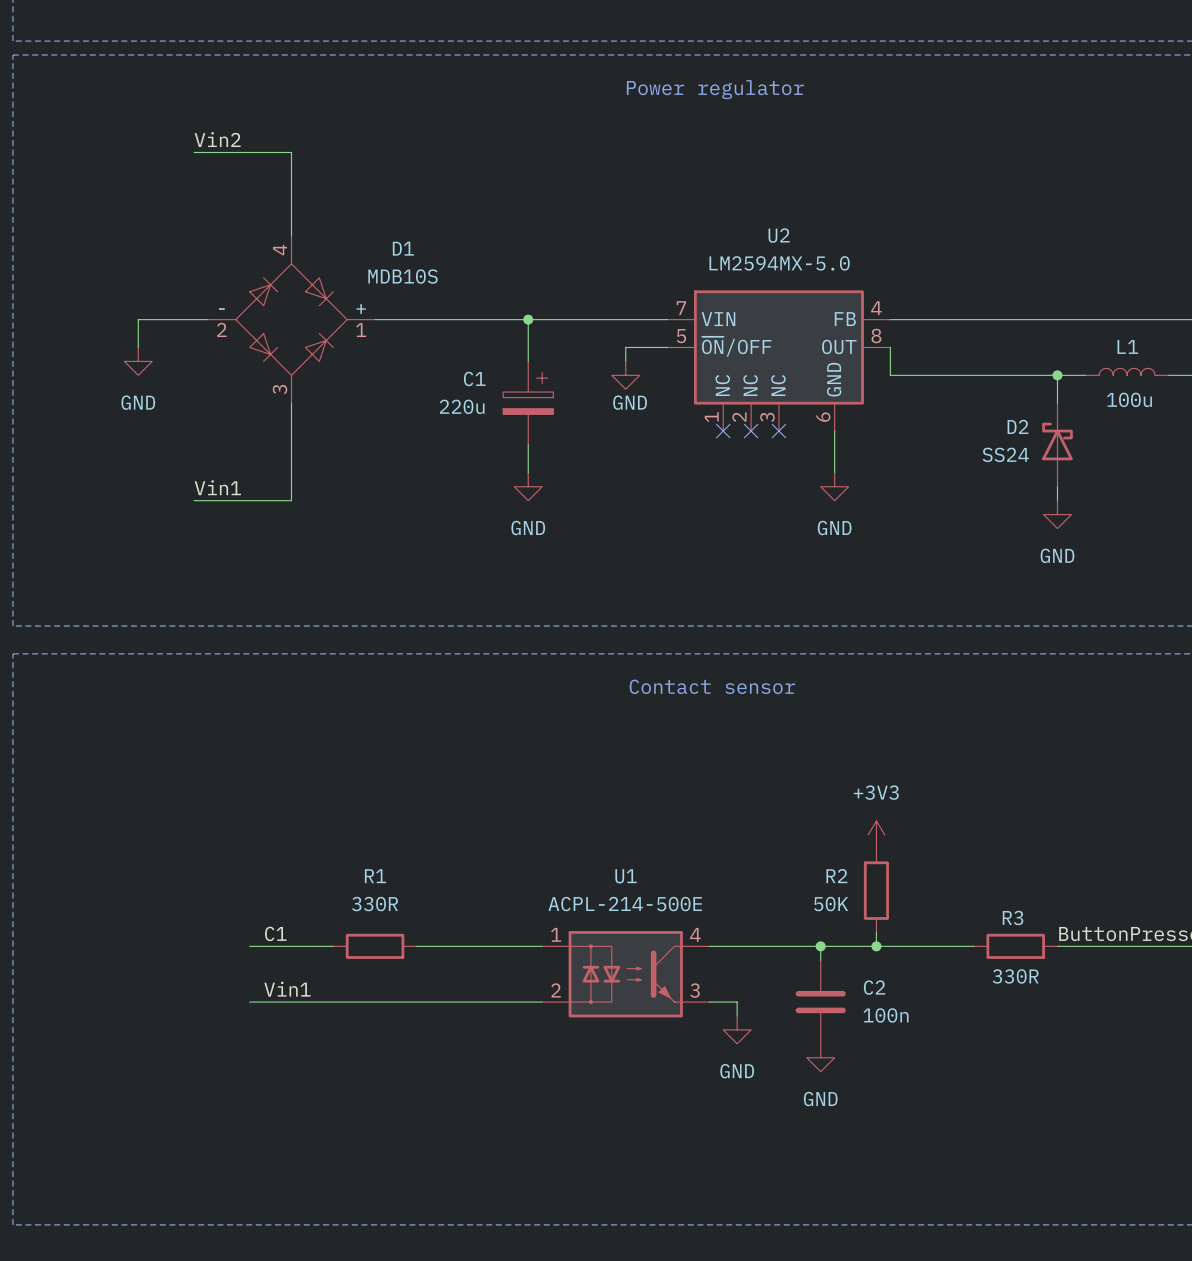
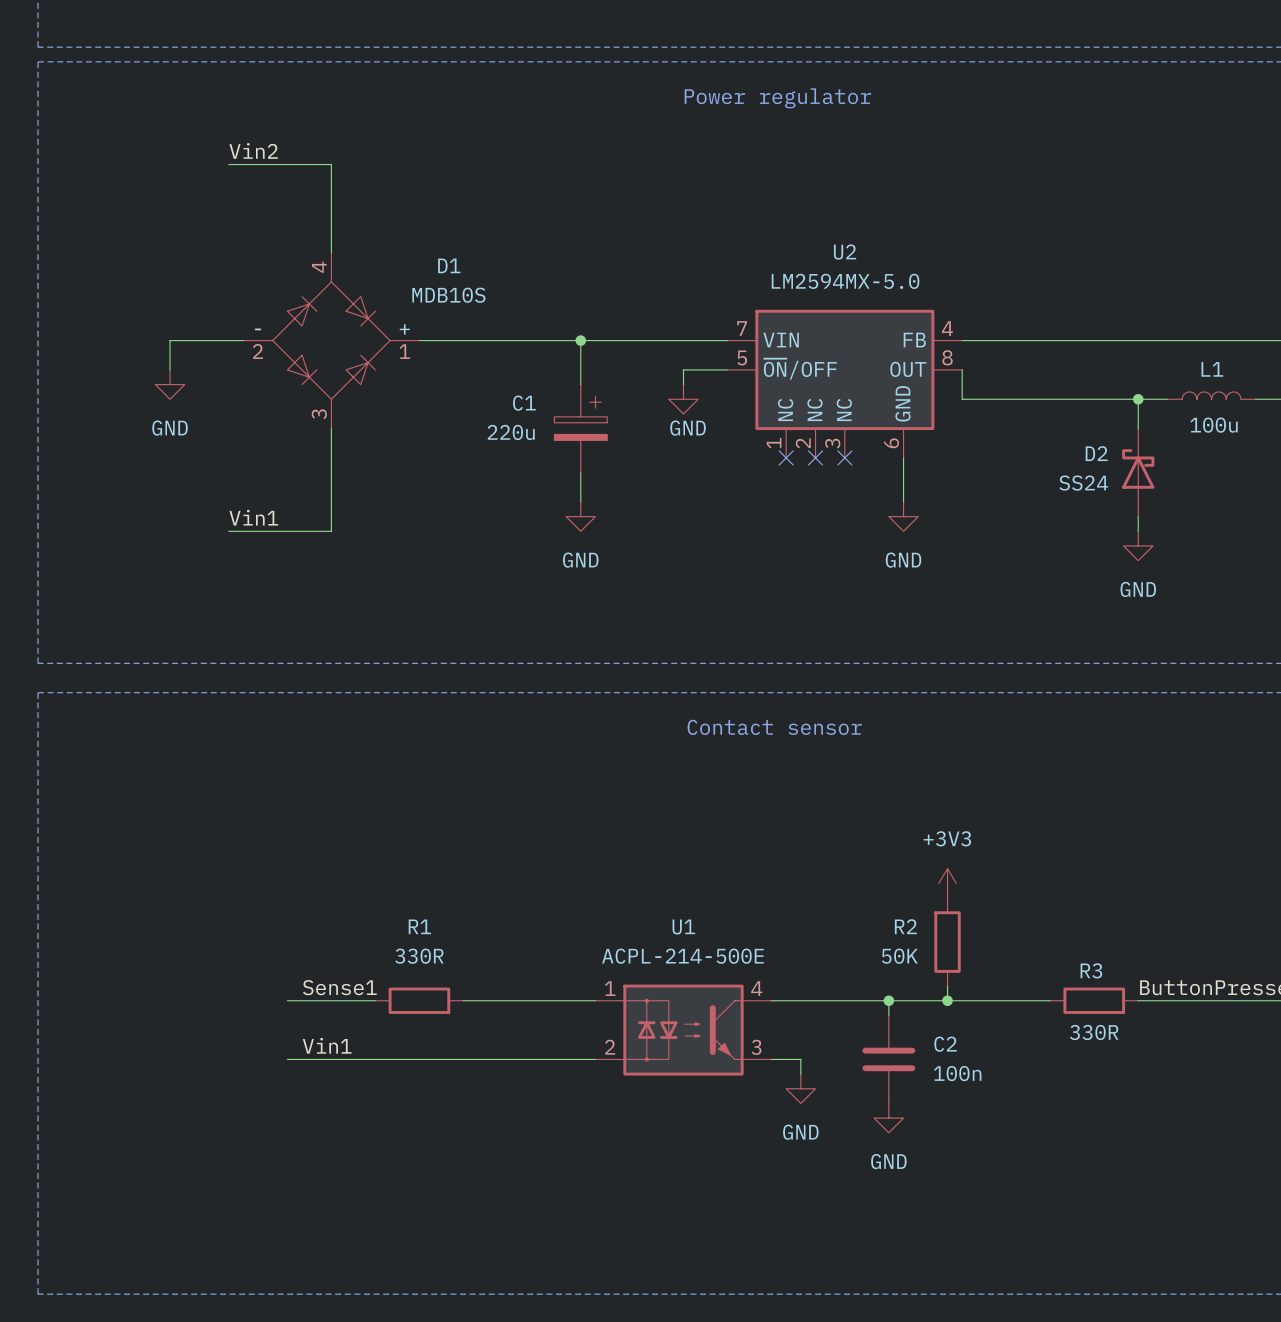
label: C1 (275, 933) -> Sense1 (339, 987)

